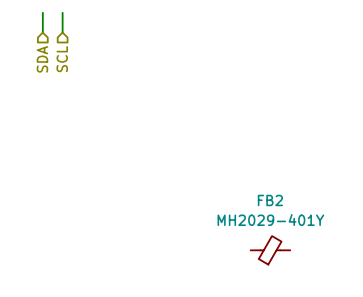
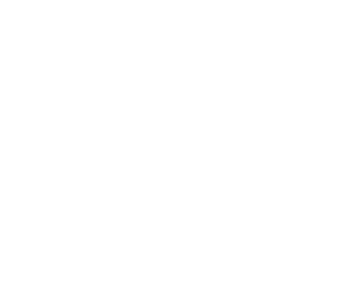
wire: (42, 12) (42, 32) -> none
wire: (62, 12) (62, 32) -> none
hierarchical label: SDA (42, 59) -> none
hierarchical label: SCL (62, 59) -> none
FB2: MH2029-401Y (270, 250) -> none

